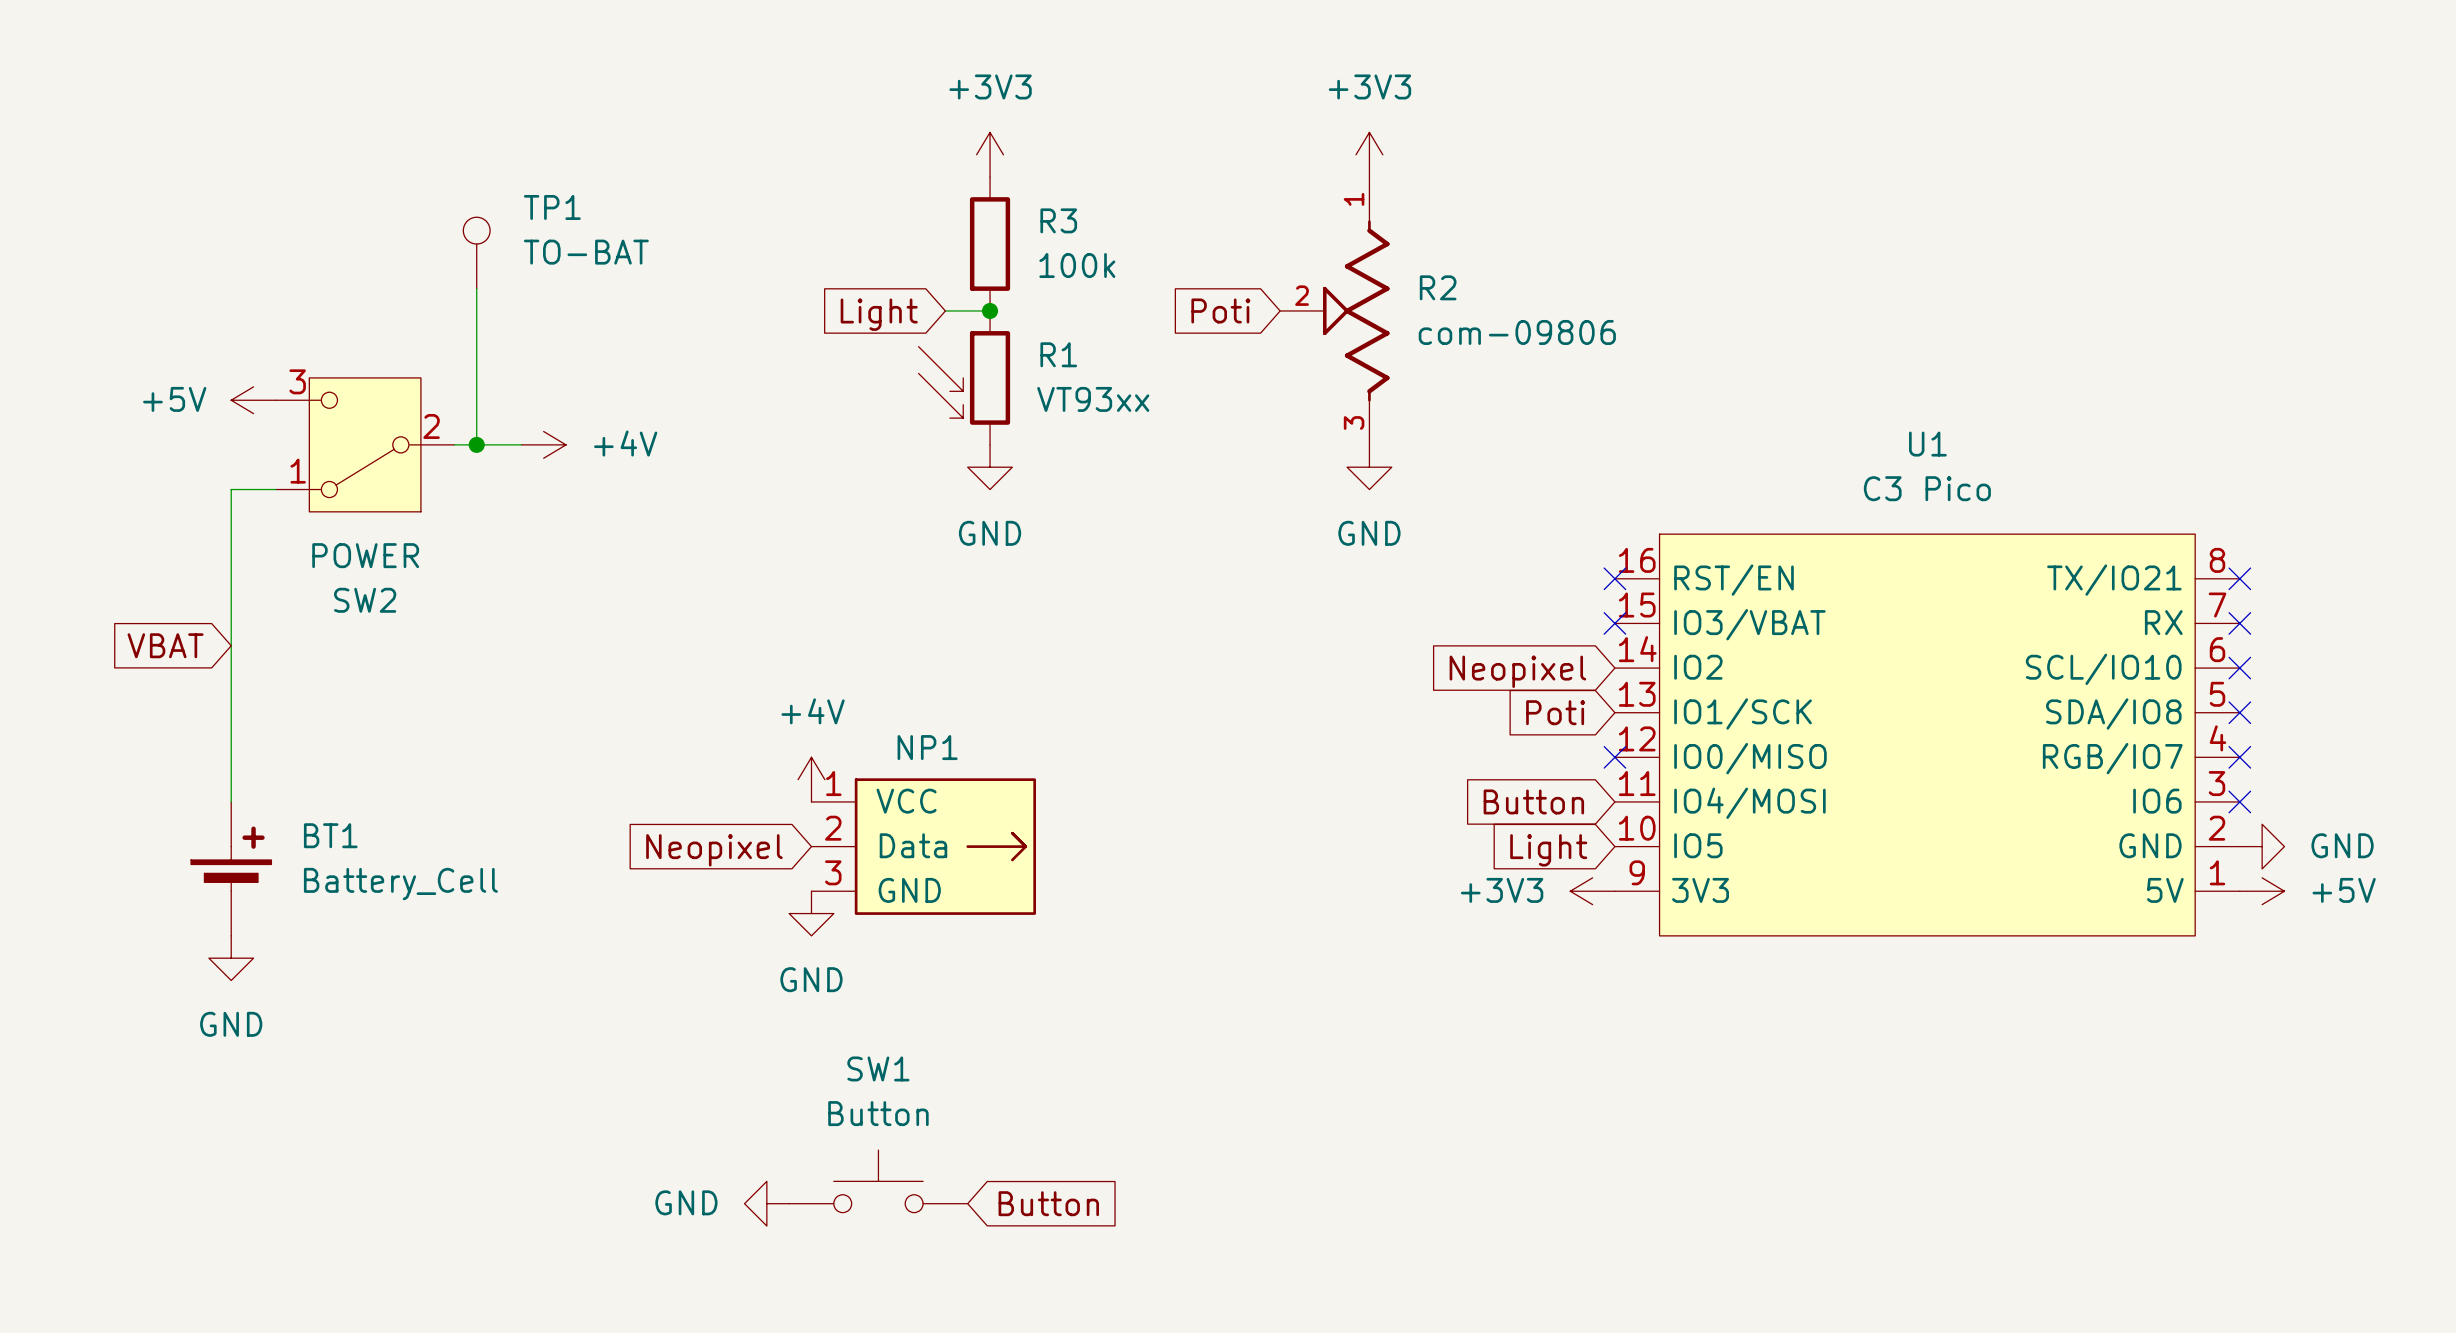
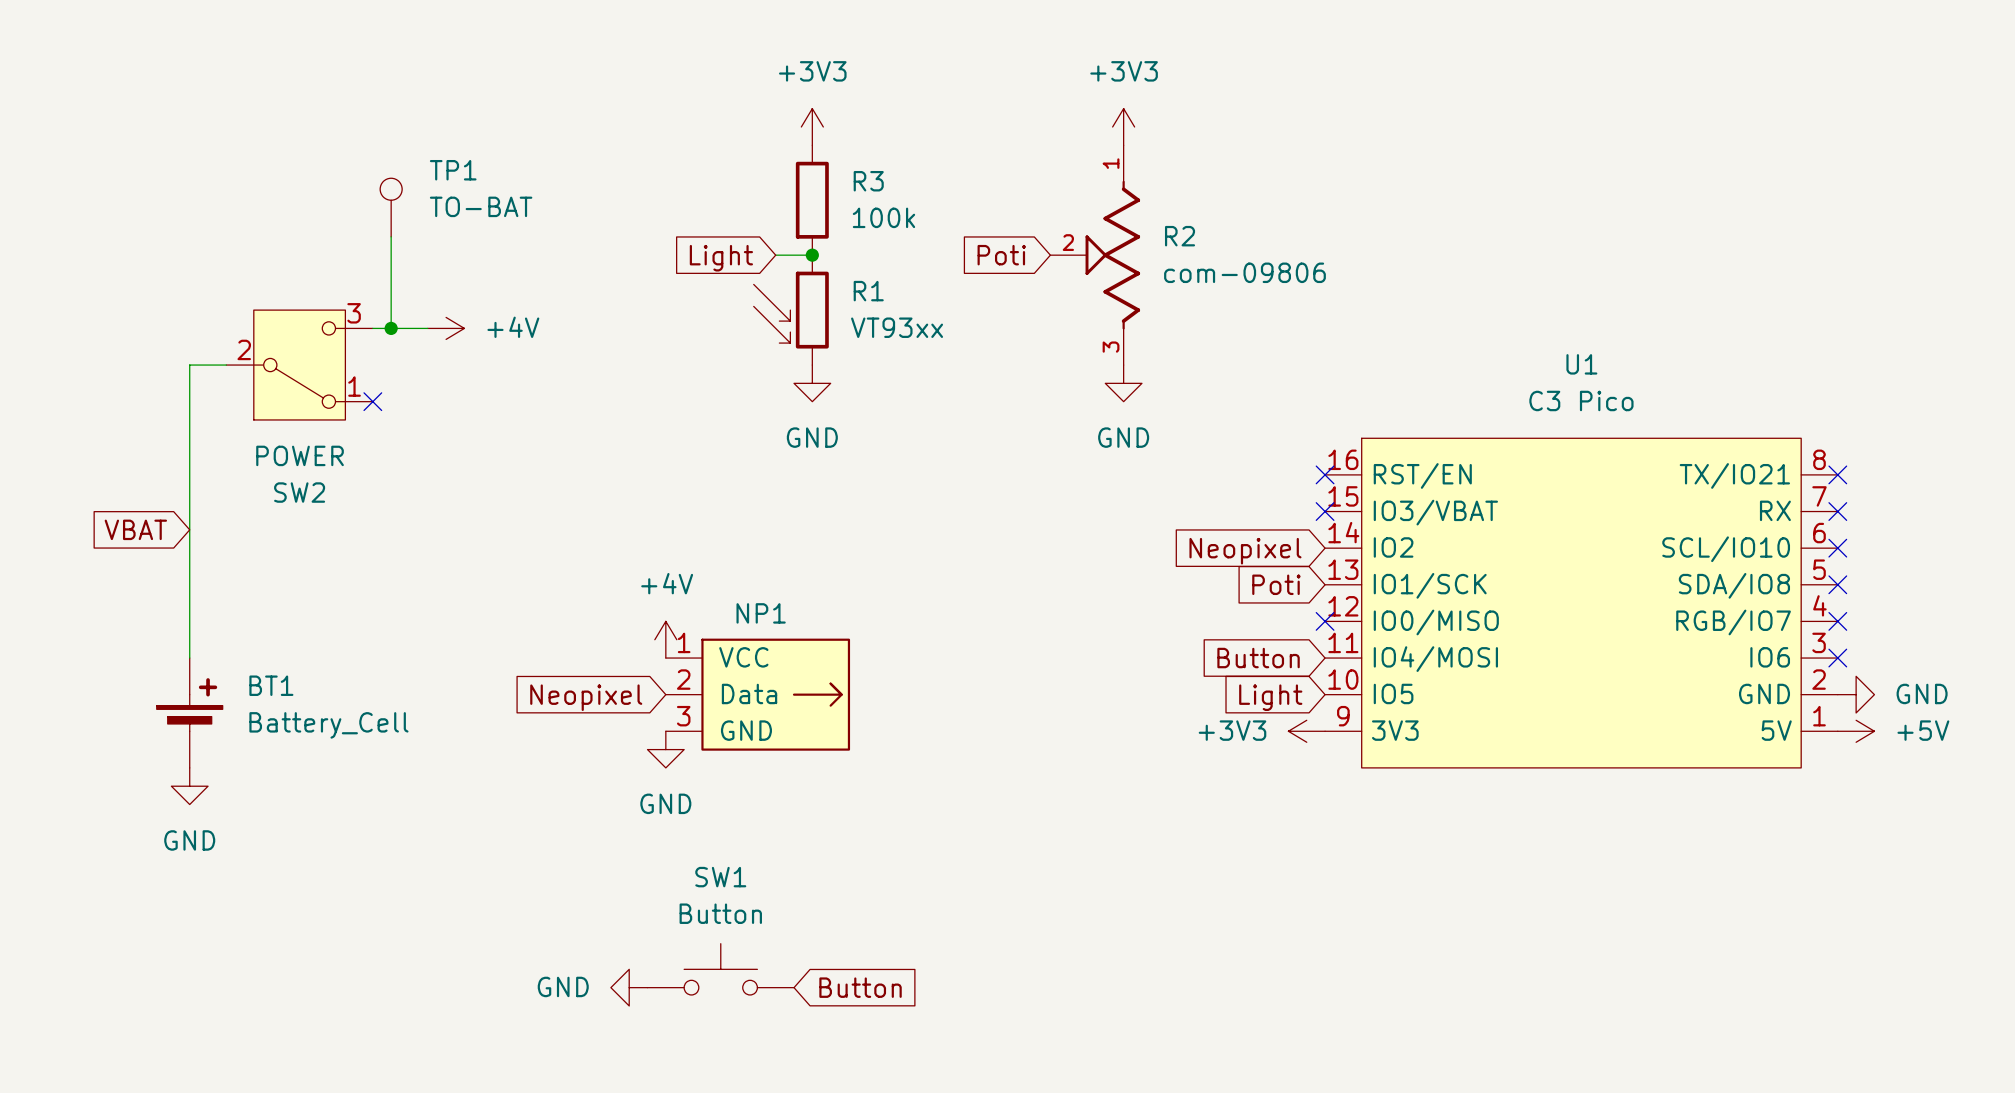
power symbol: +5V (253, 400) -> none
wire: (476, 400) (476, 444) -> none
SW2 flip: as is (365, 444) -> left-right (299, 365)
wire: (454, 444) (521, 444) -> (372, 328) (427, 328)
junction position: (476, 444) -> (391, 328)
power symbol position: +4V (543, 444) -> +4V (446, 328)
wire: (231, 489) (275, 489) -> (189, 401) (189, 365) (226, 365)
no-connect mark: none -> (372, 401)

